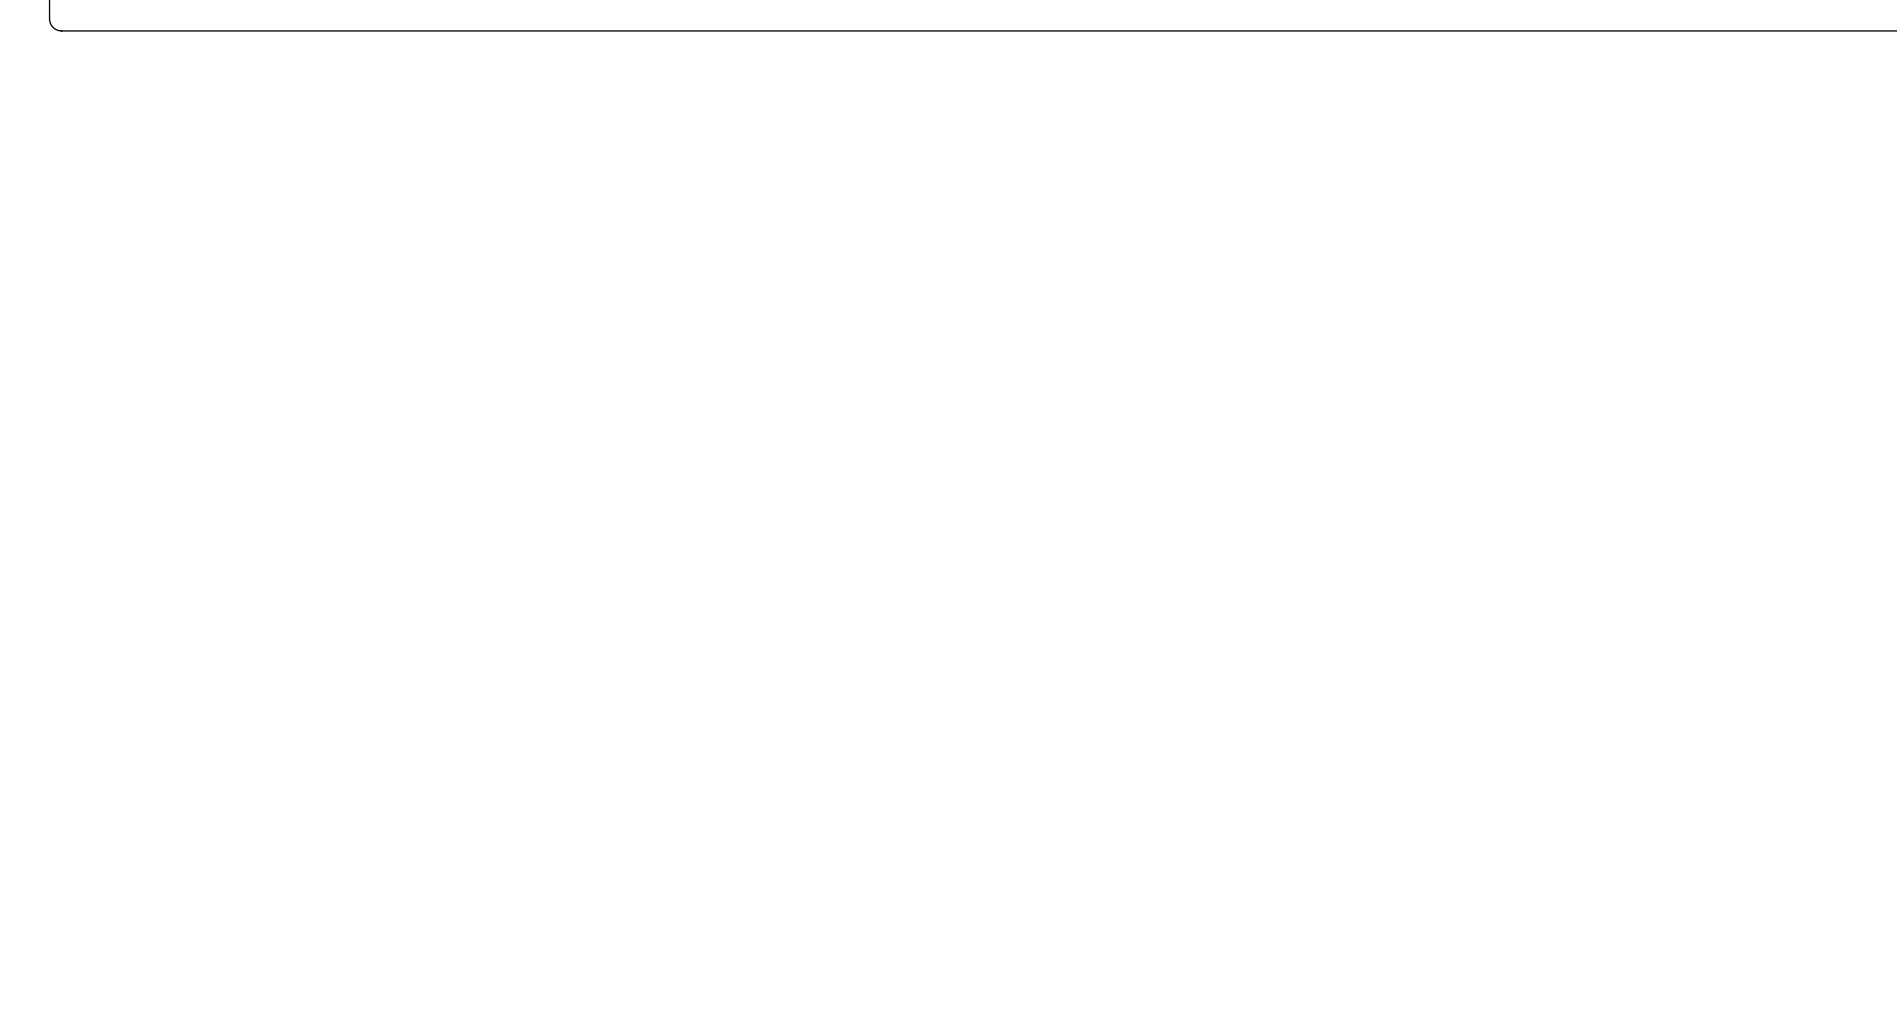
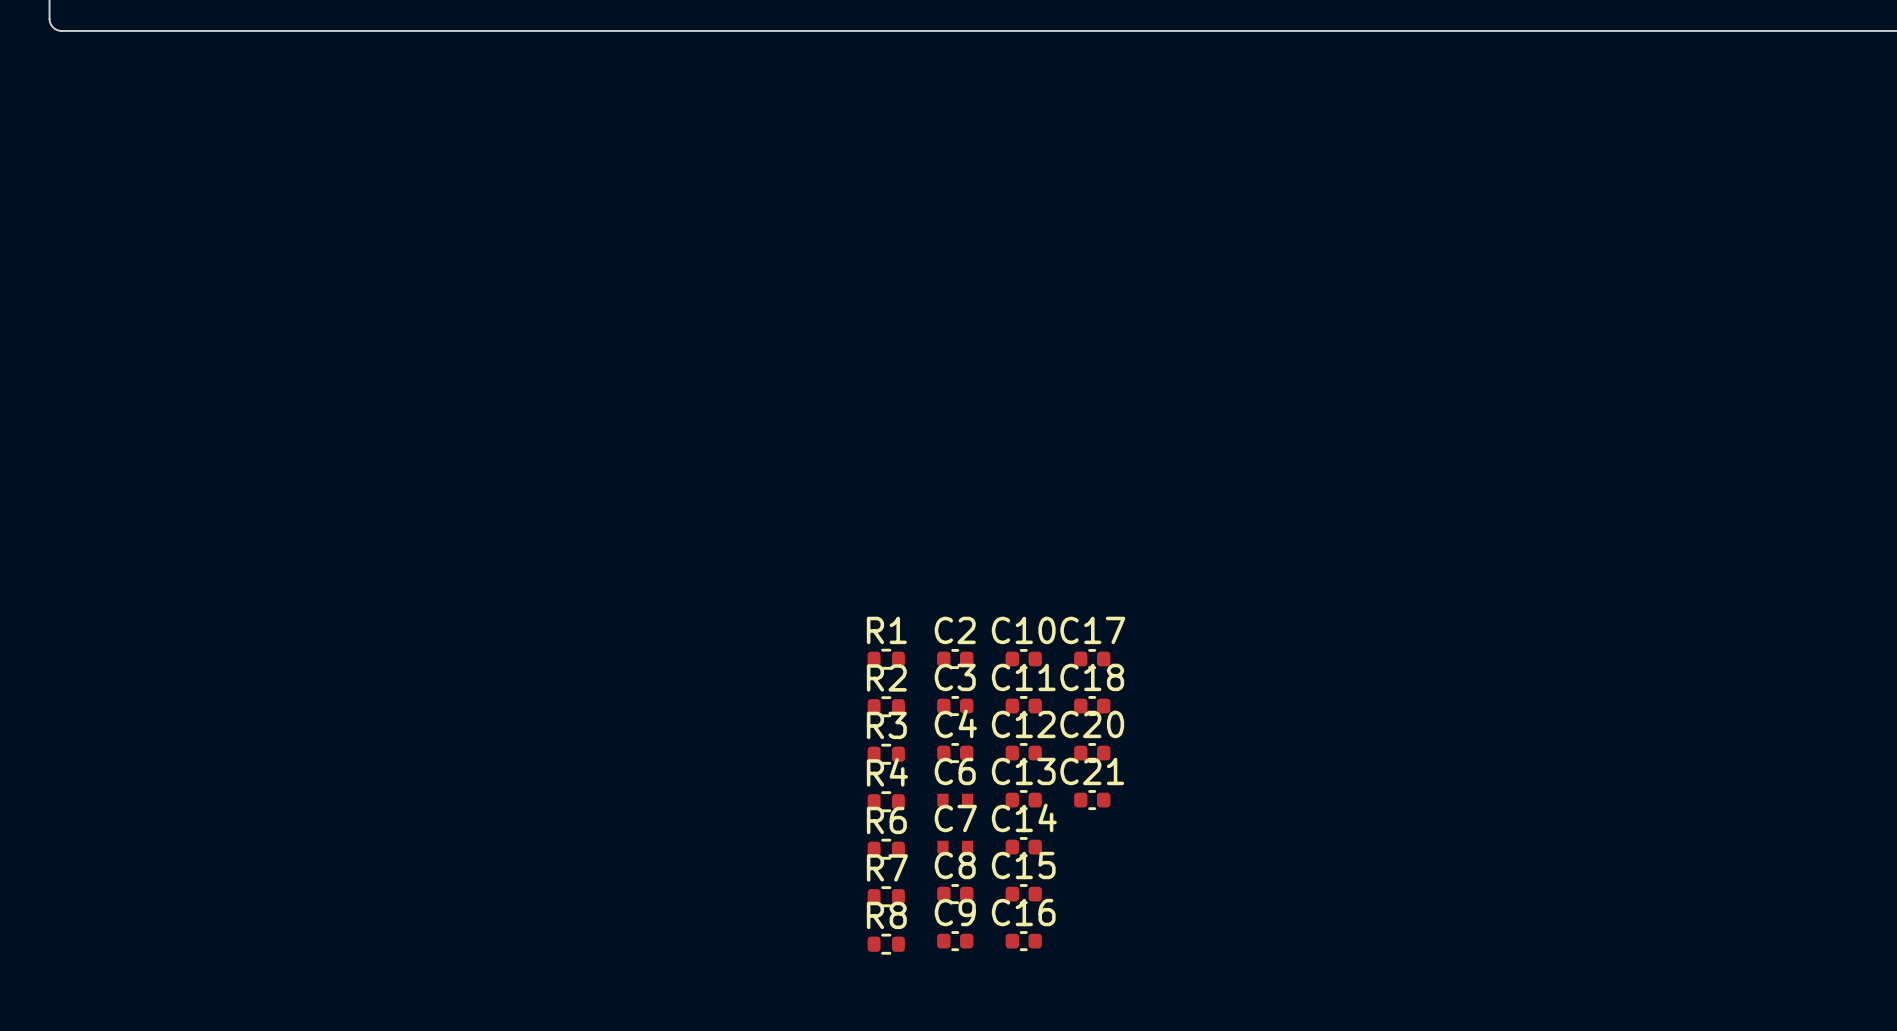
R1: none -> (886, 659)
C2: none -> (955, 659)
C10: none -> (1023, 659)
C17: none -> (1092, 659)
R2: none -> (886, 706)
C3: none -> (955, 706)
C11: none -> (1023, 706)
C18: none -> (1092, 706)
C4: none -> (955, 753)
C12: none -> (1023, 753)
C20: none -> (1092, 753)
R3: none -> (886, 754)
C6: none -> (955, 800)
C13: none -> (1023, 800)
C21: none -> (1092, 800)
R4: none -> (886, 801)
C7: none -> (955, 847)
C14: none -> (1023, 847)
R6: none -> (886, 849)
C8: none -> (955, 894)
C15: none -> (1023, 894)
R7: none -> (886, 896)
C9: none -> (955, 941)
C16: none -> (1023, 941)
R8: none -> (886, 944)

